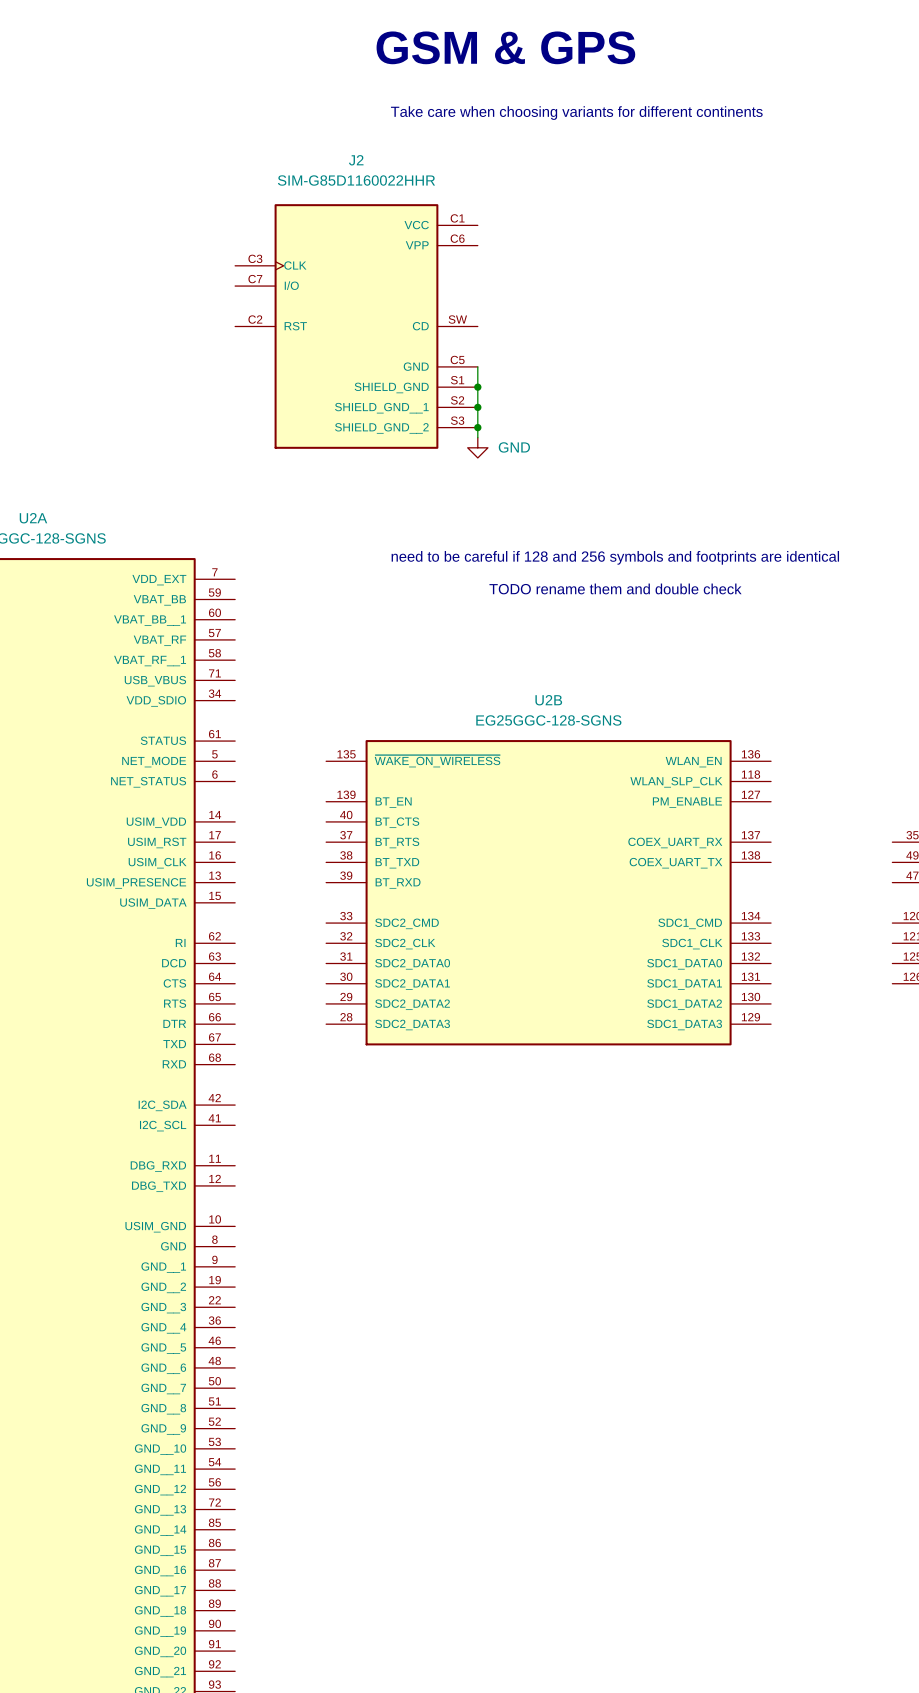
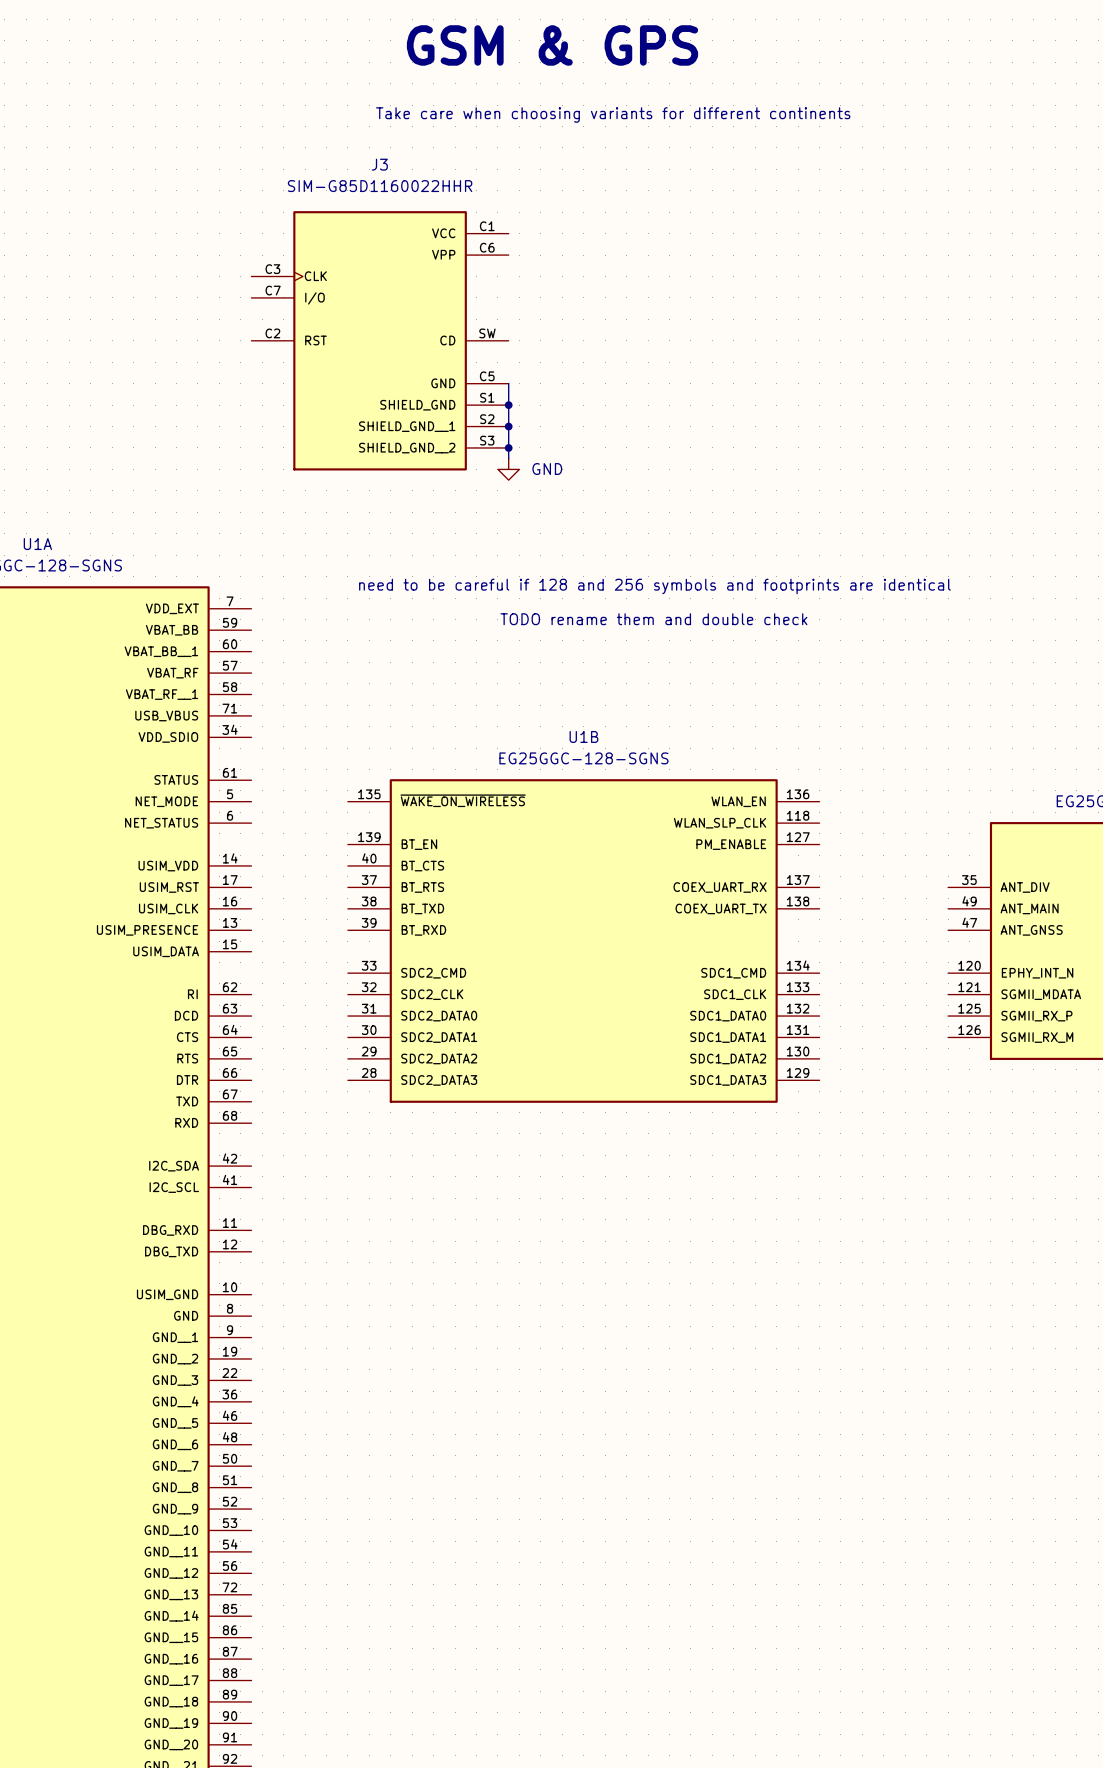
J2 name: J2 (356, 160) -> J3 (379, 164)
U2A name: U2A (33, 518) -> U1A (37, 544)
U2B name: U2B (548, 700) -> U1B (583, 736)

